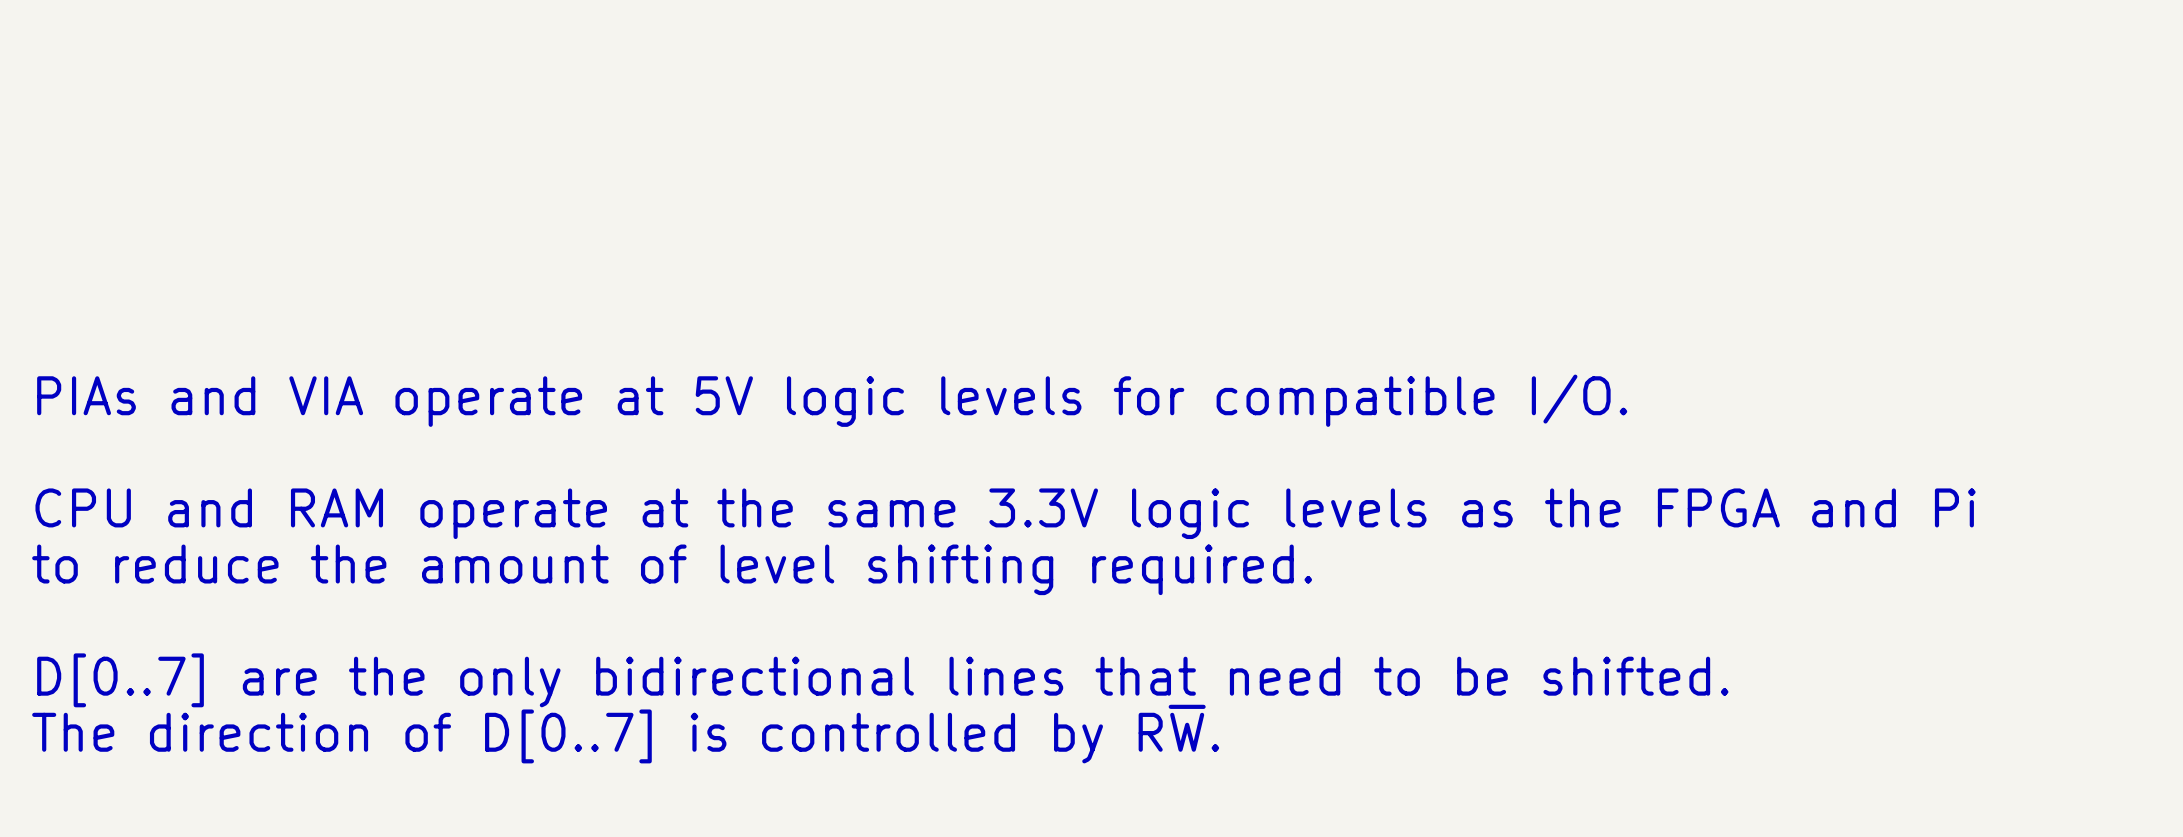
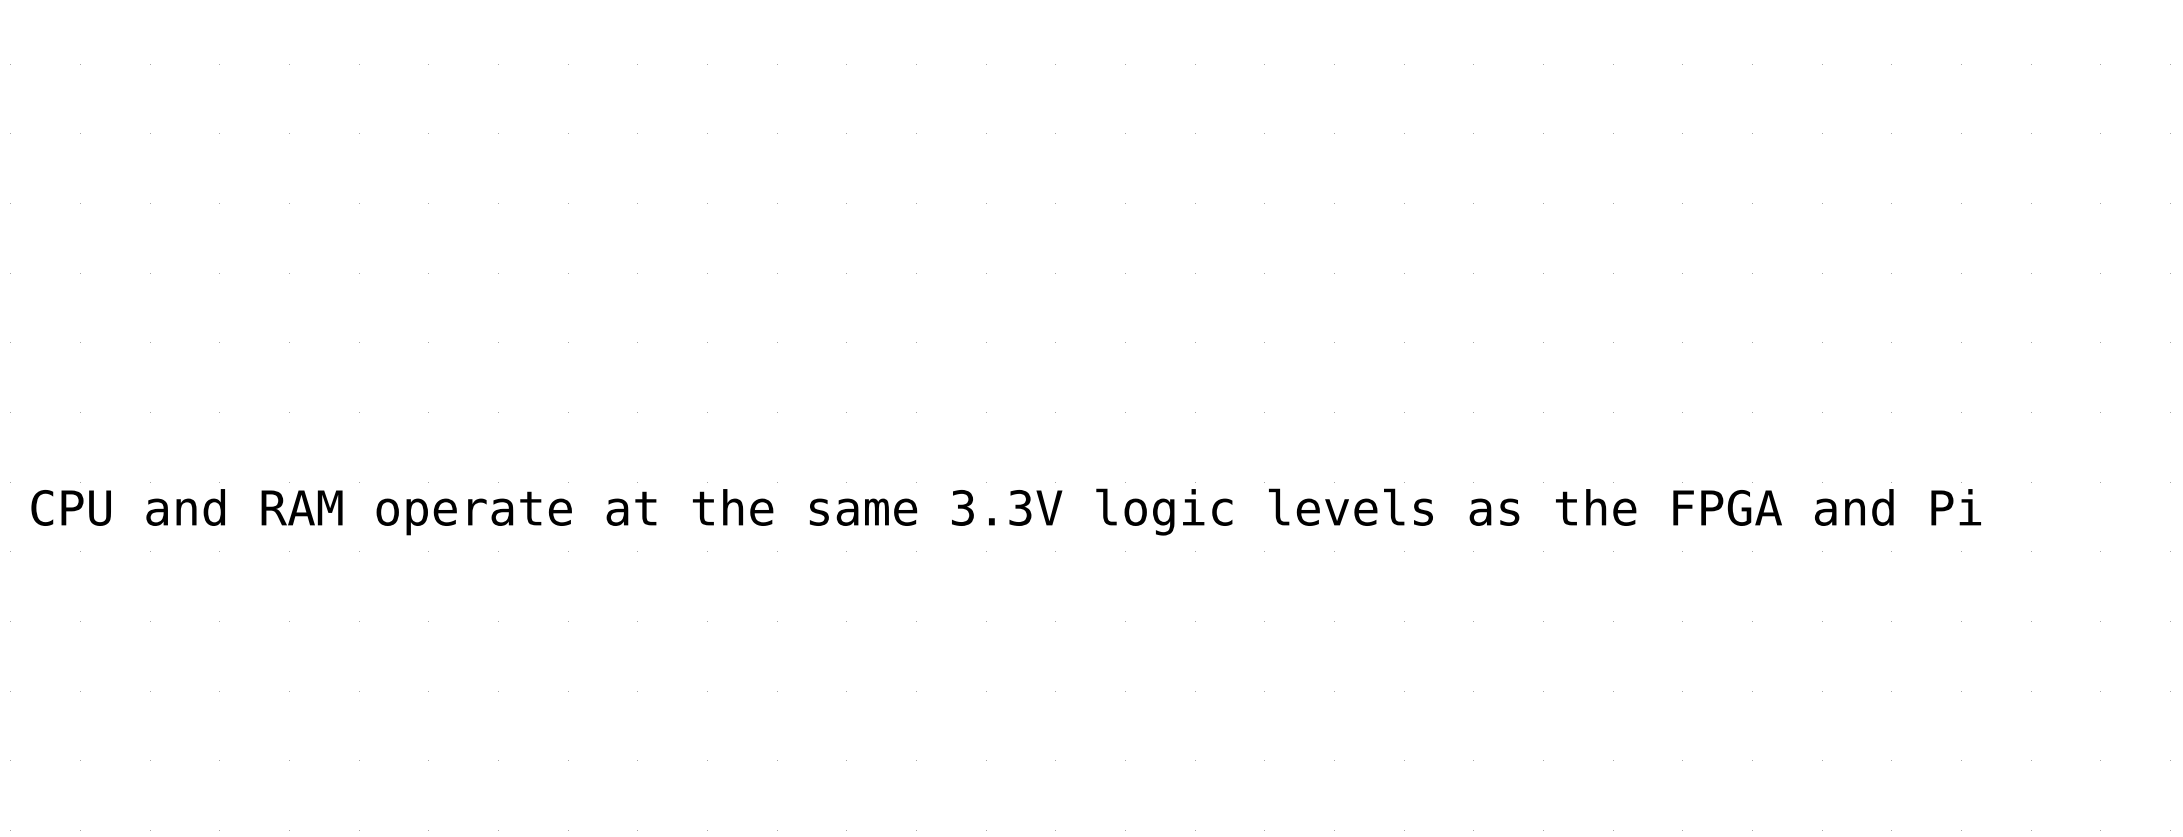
text: PIAs and VIA operate at 5V logic levels for compatible I/O. (832, 400) -> none
text: to reduce the amount of level shifting required. (672, 569) -> none
text: D[0..7] are the only bidirectional lines that need to be shifted. (882, 680) -> none
text: The direction of D[0..7] is controlled by R~{W}. (625, 734) -> none

